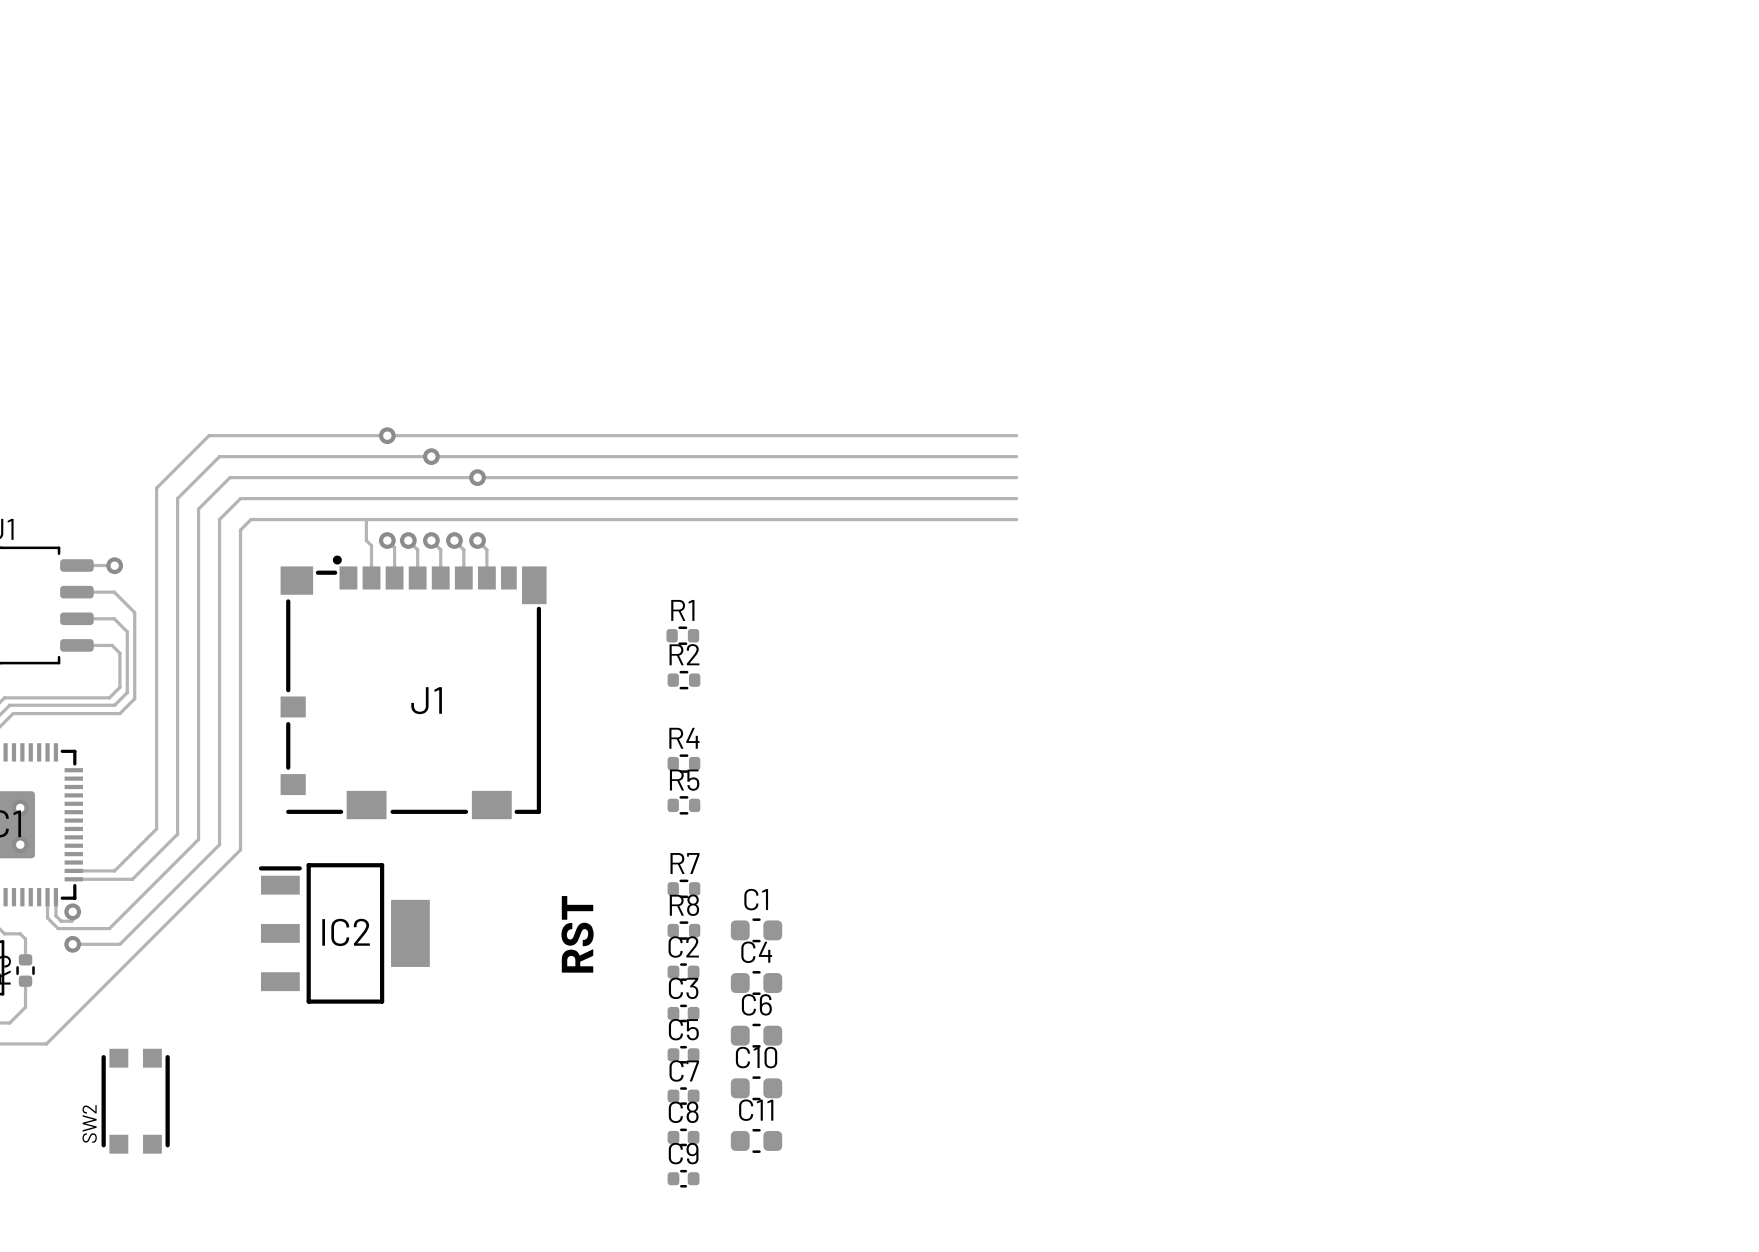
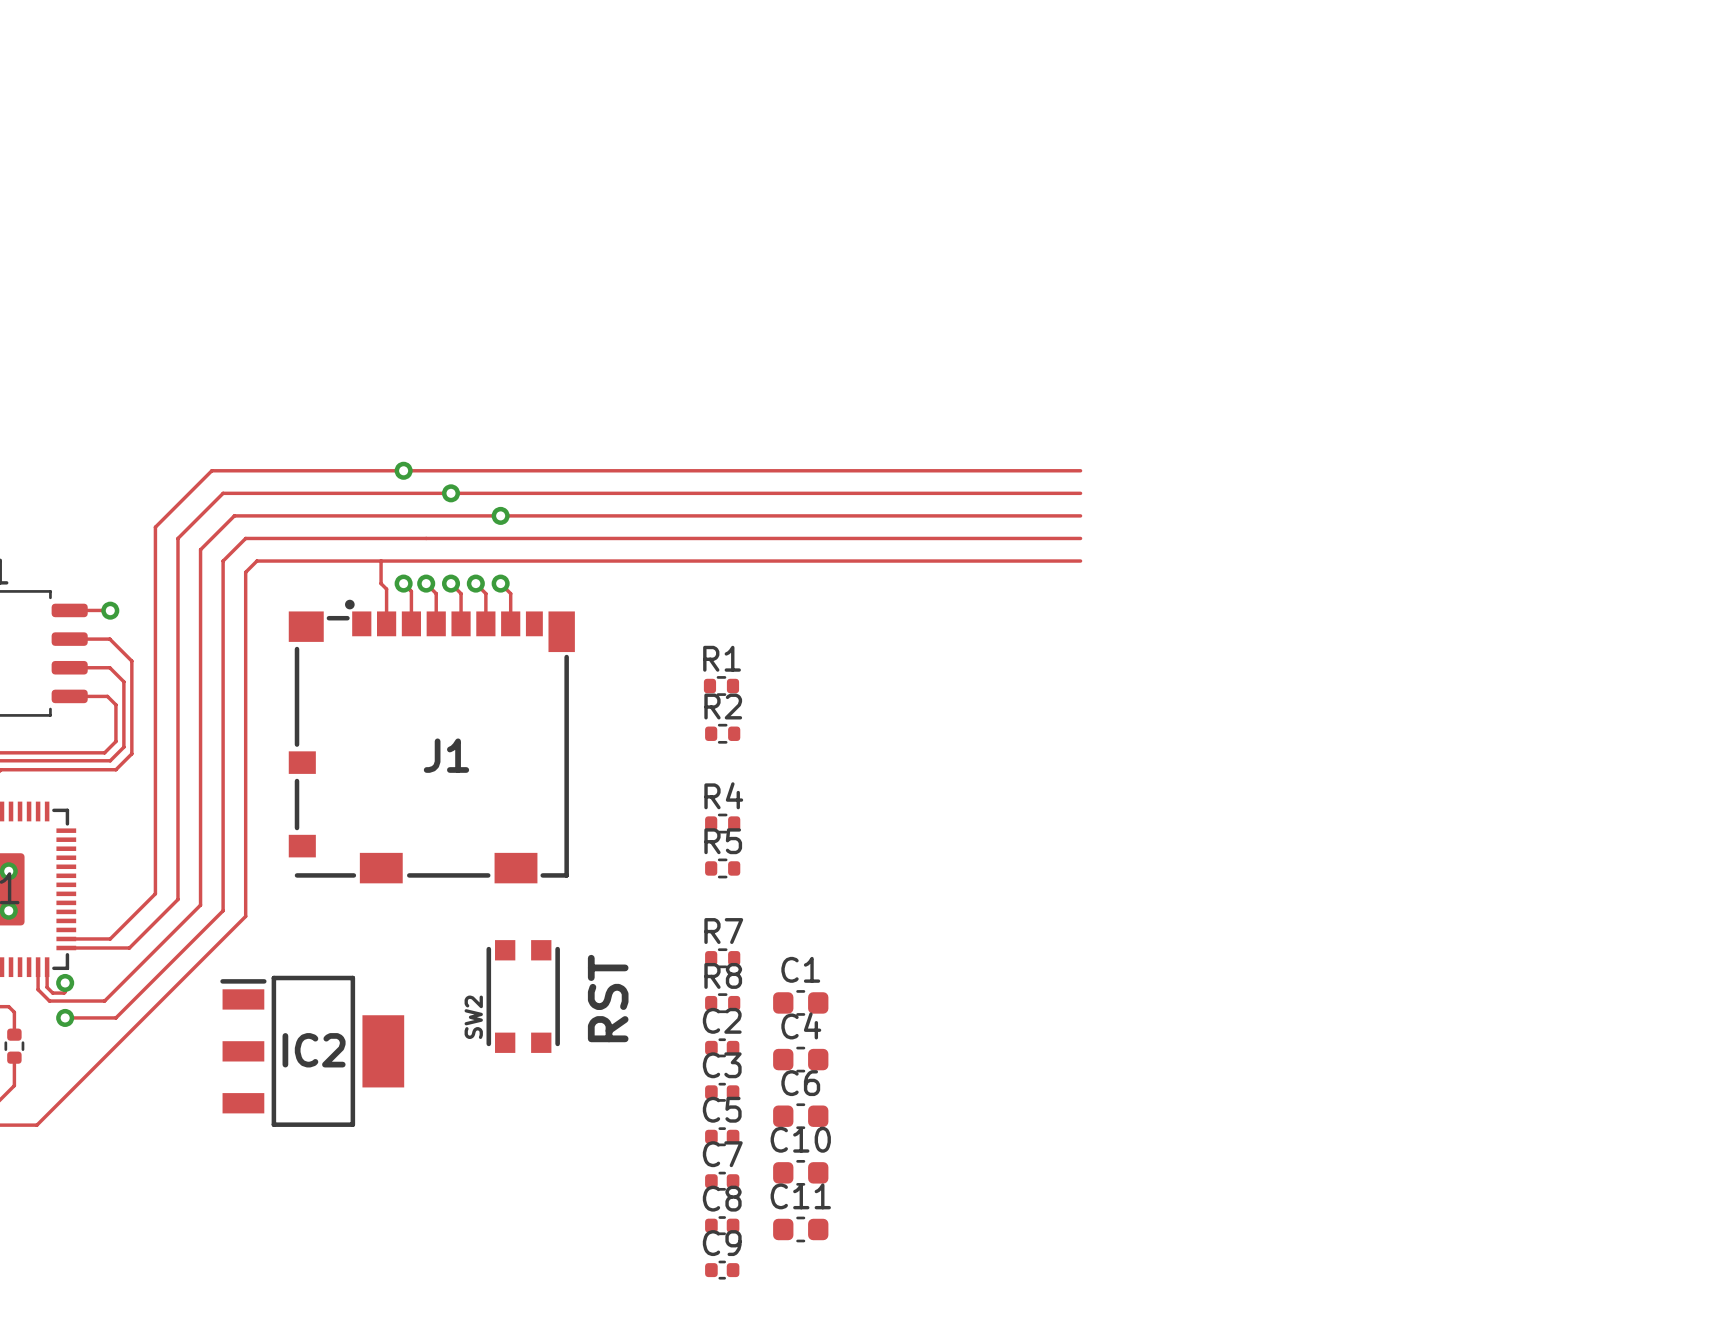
IC2 position: (344, 933) -> (312, 1051)
SW2 position: (135, 1101) -> (523, 996)

